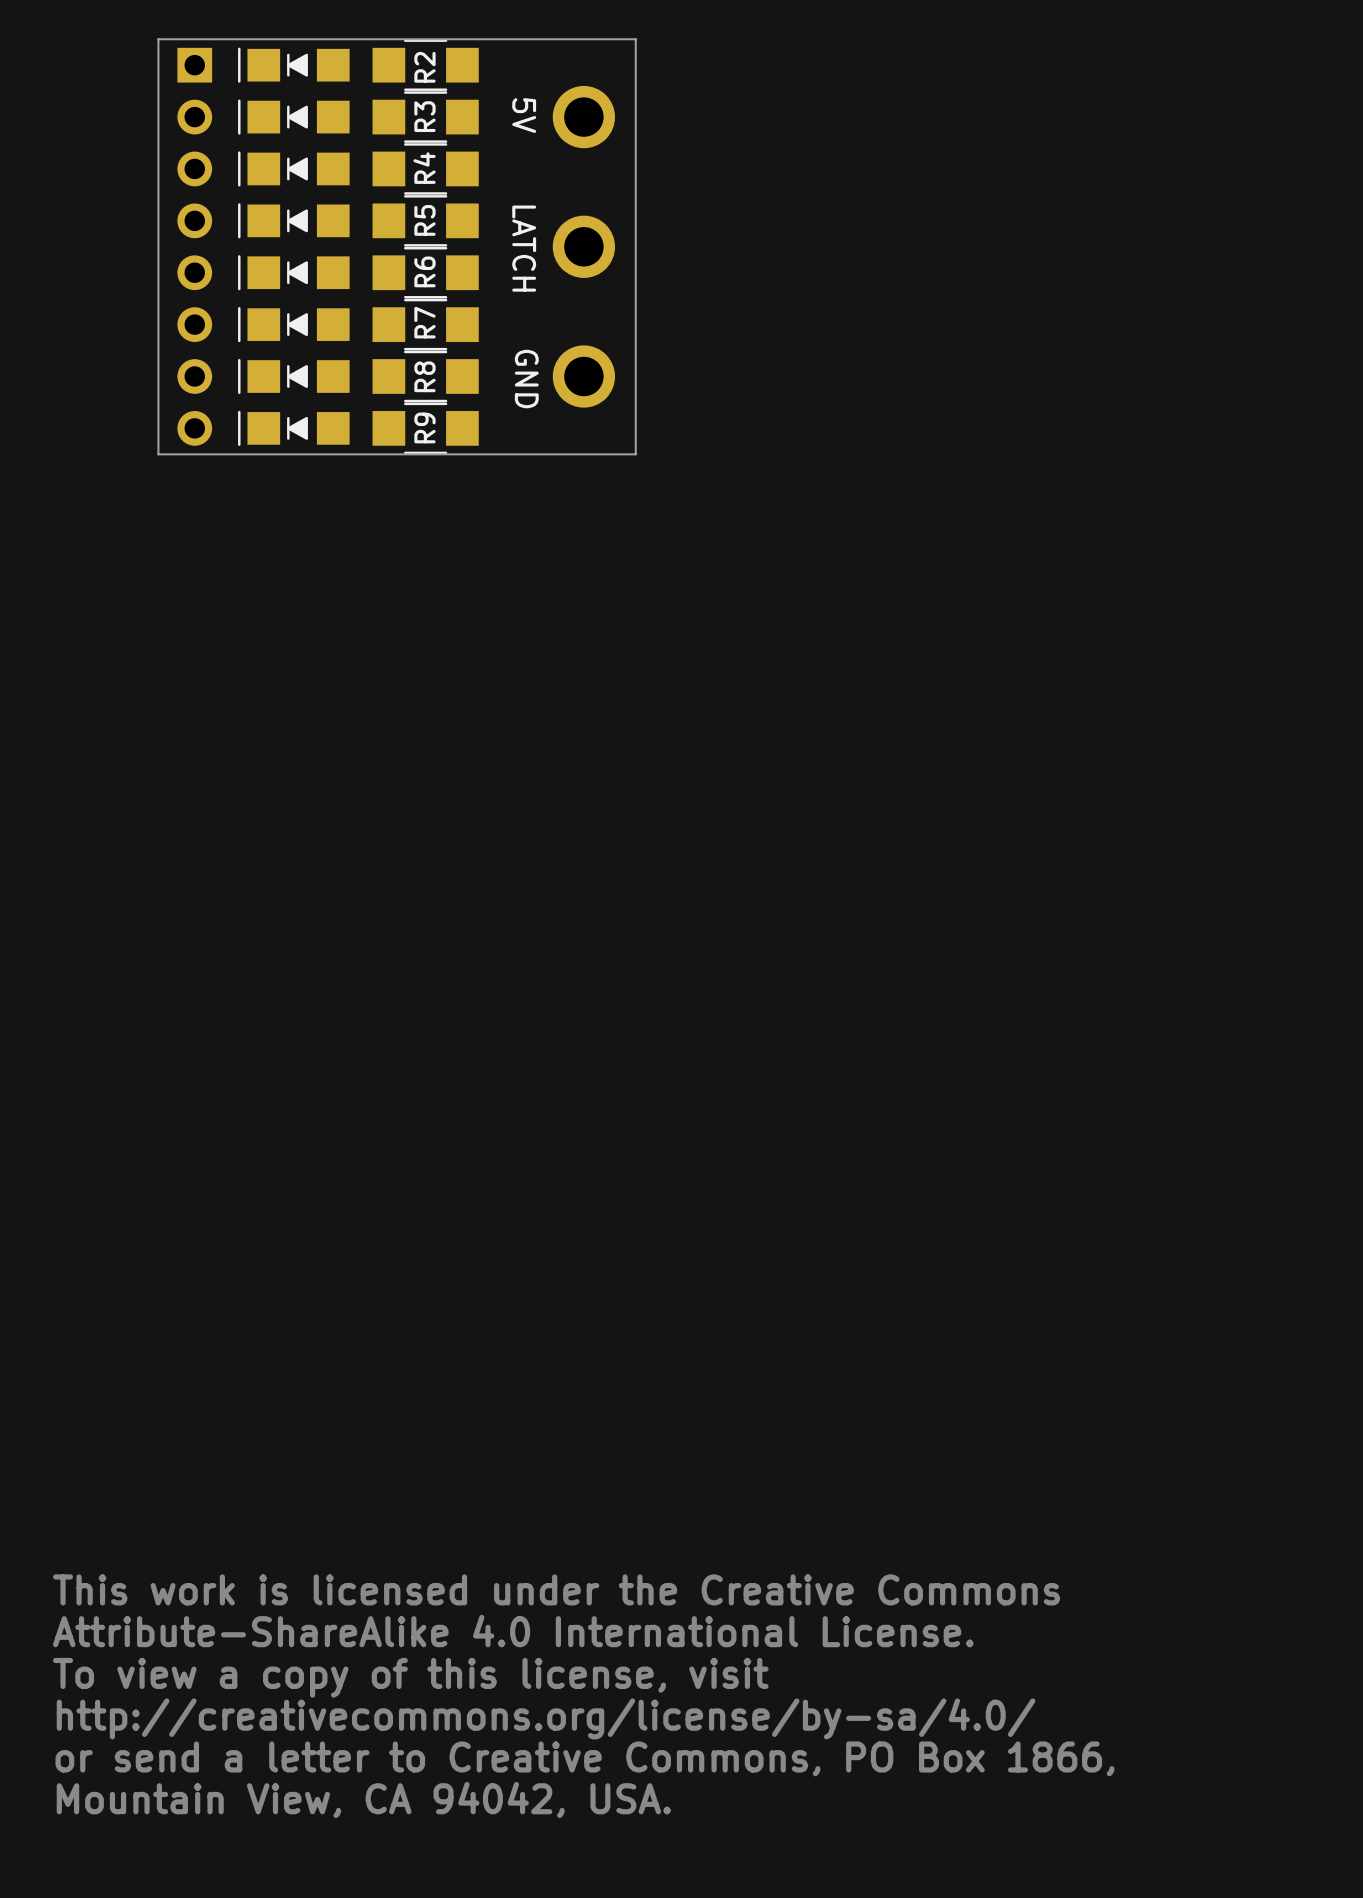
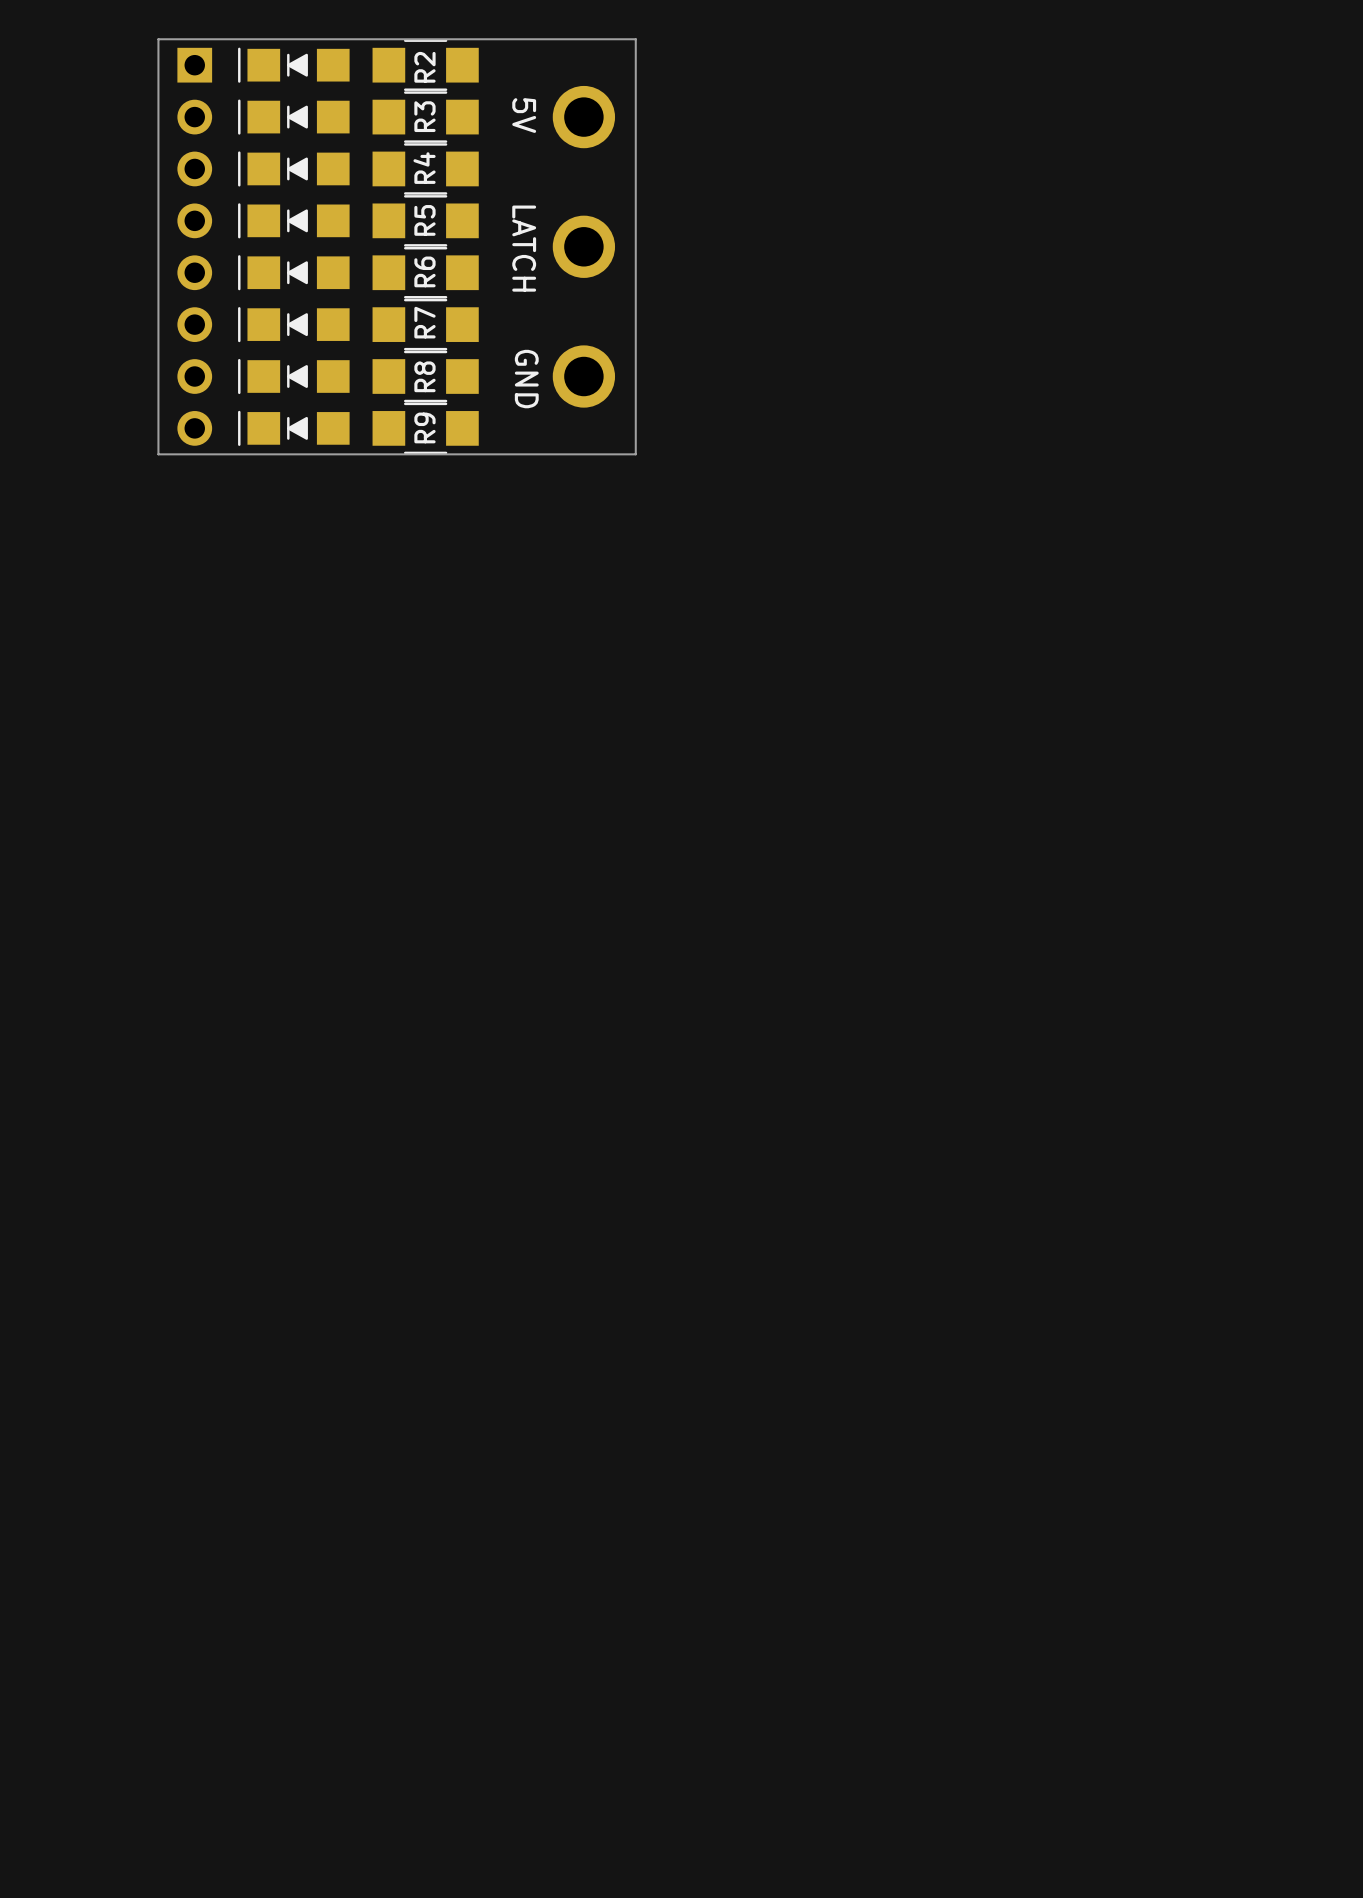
text: This work is licensed under the Creative Commons (556, 1589) -> none
text: Attribute-ShareAlike 4.0 International License. (513, 1631) -> none
text: To view a copy of this license, visit (410, 1677) -> none
text: http://creativecommons.org/license/by-sa/4.0/ (546, 1718) -> none
text: or send a letter to Creative Commons, PO Box 1866, (584, 1758) -> none
text: Mountain View, CA 94042, USA. (363, 1799) -> none

